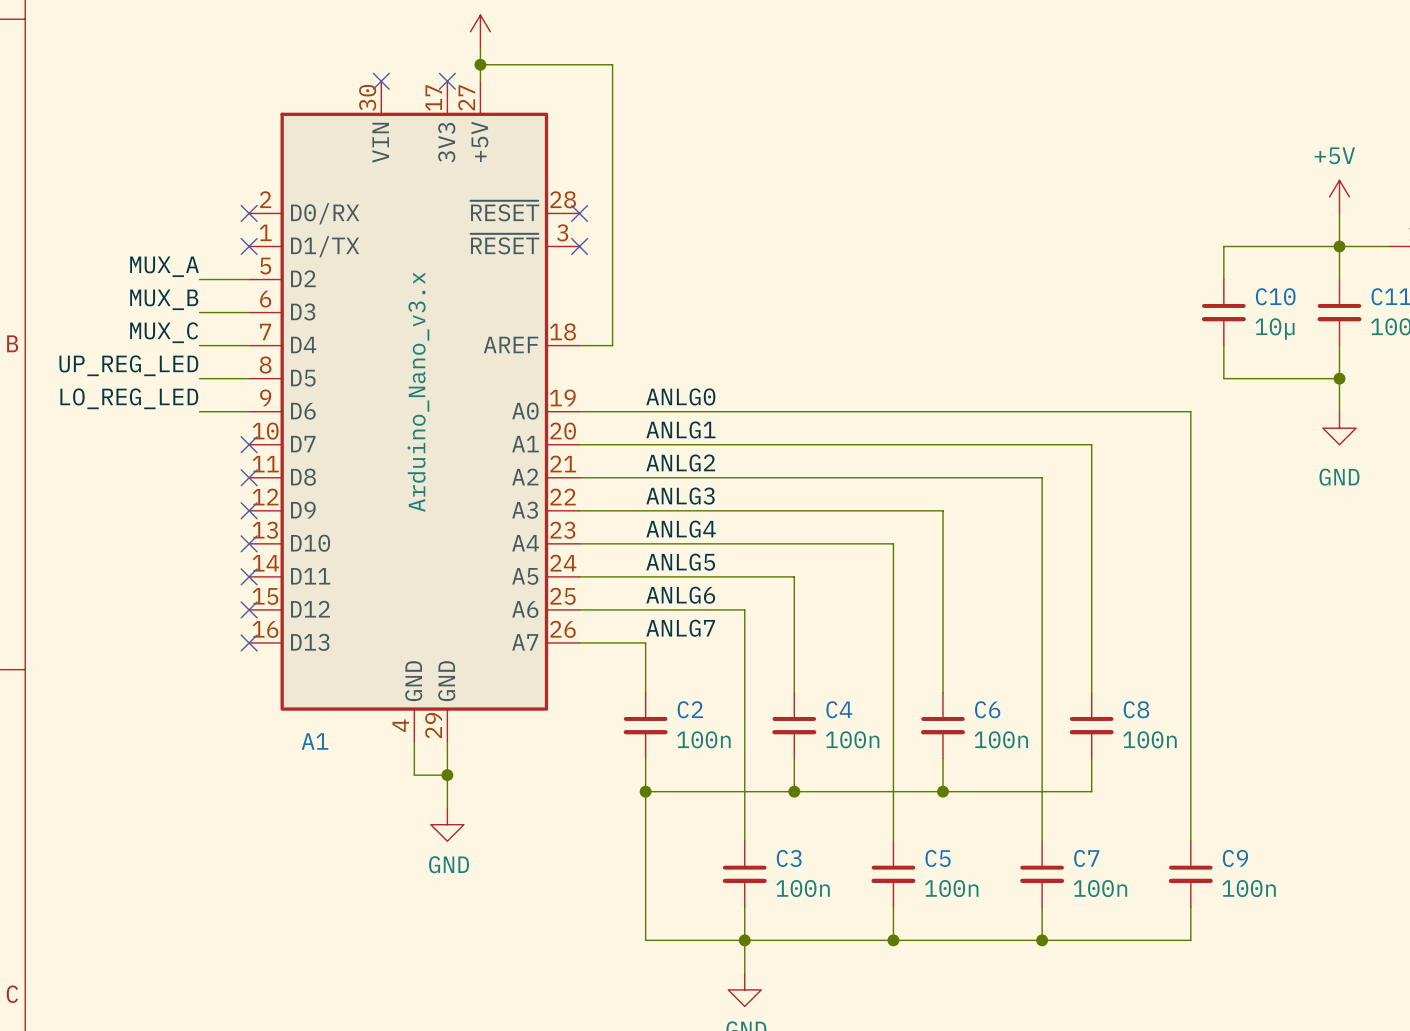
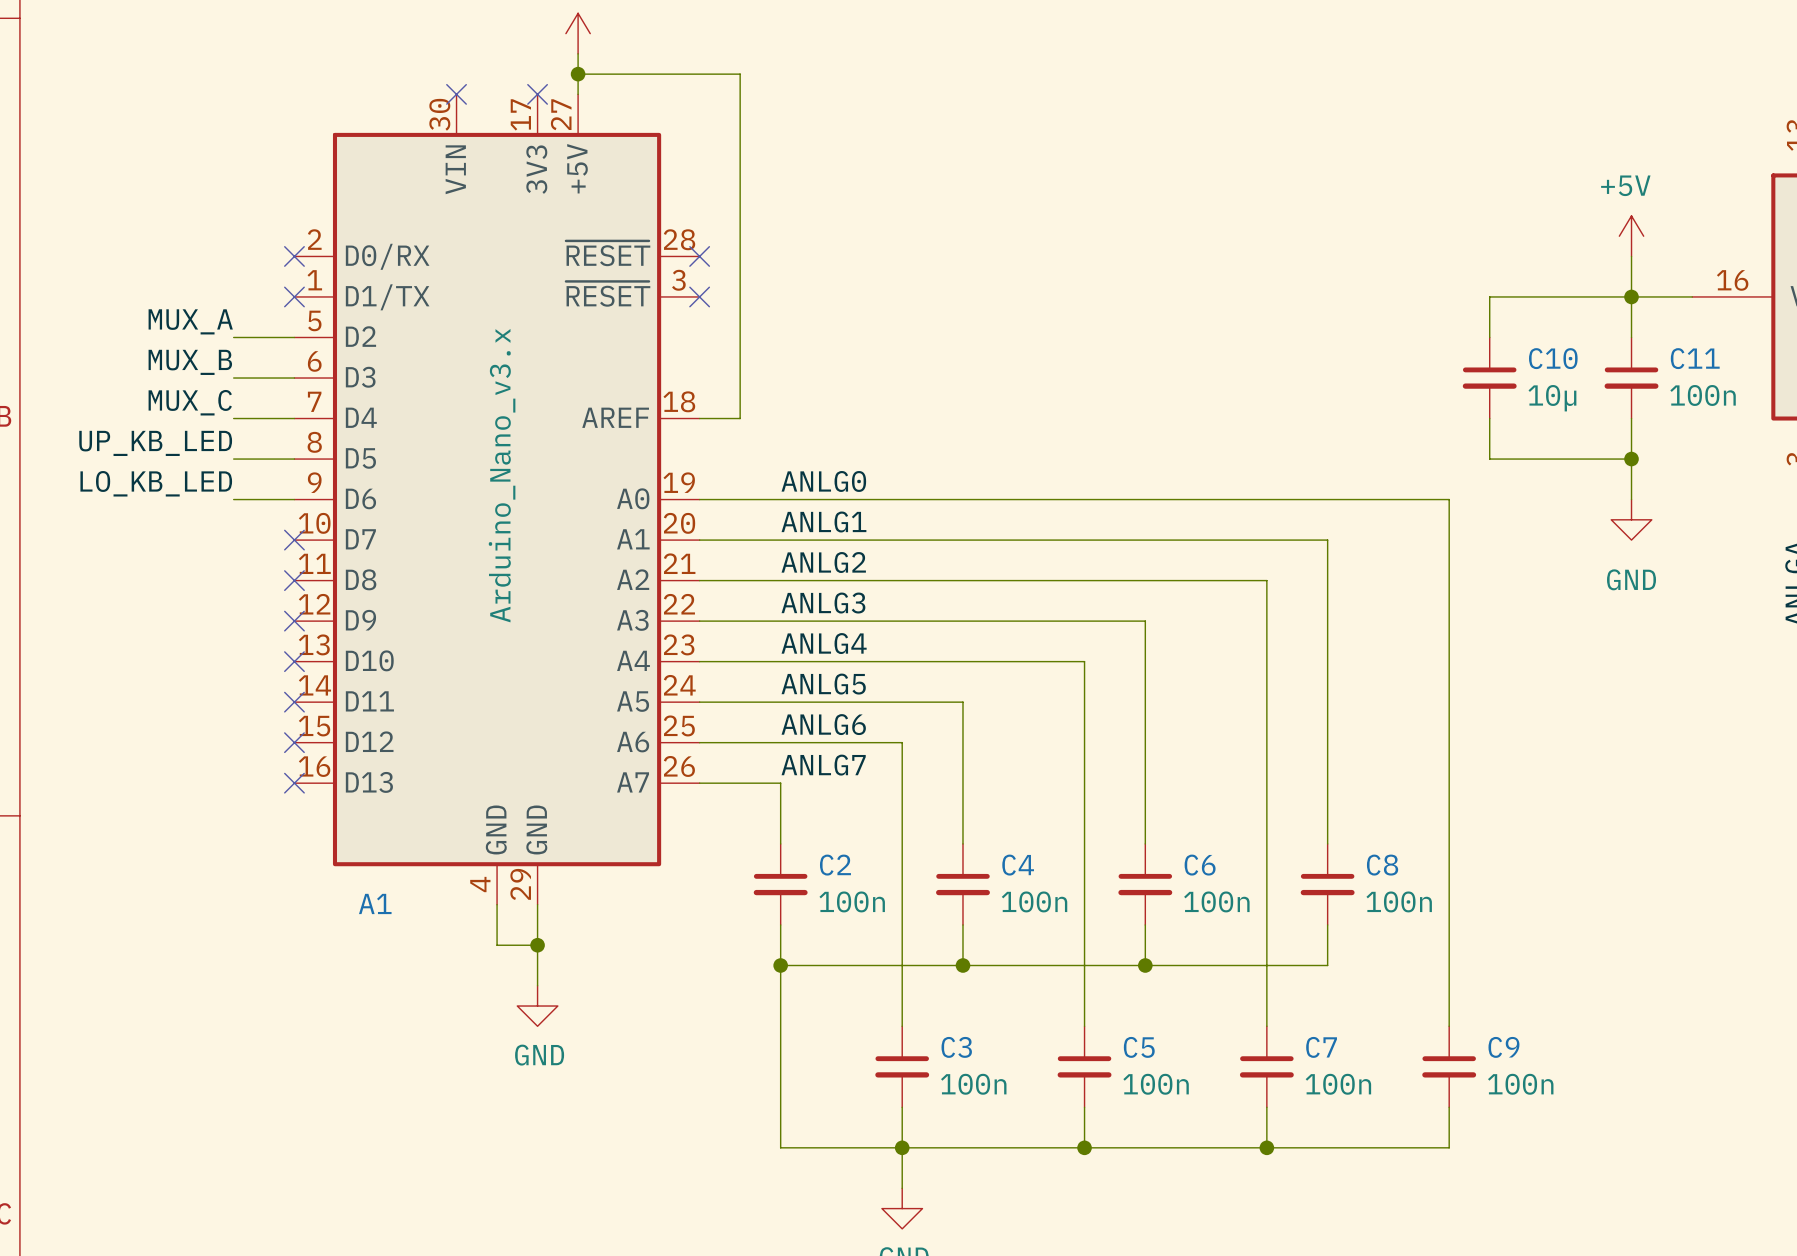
label: UP_REG_LED (128, 365) -> UP_KB_LED (155, 443)
label: LO_REG_LED (129, 398) -> LO_KB_LED (156, 483)

